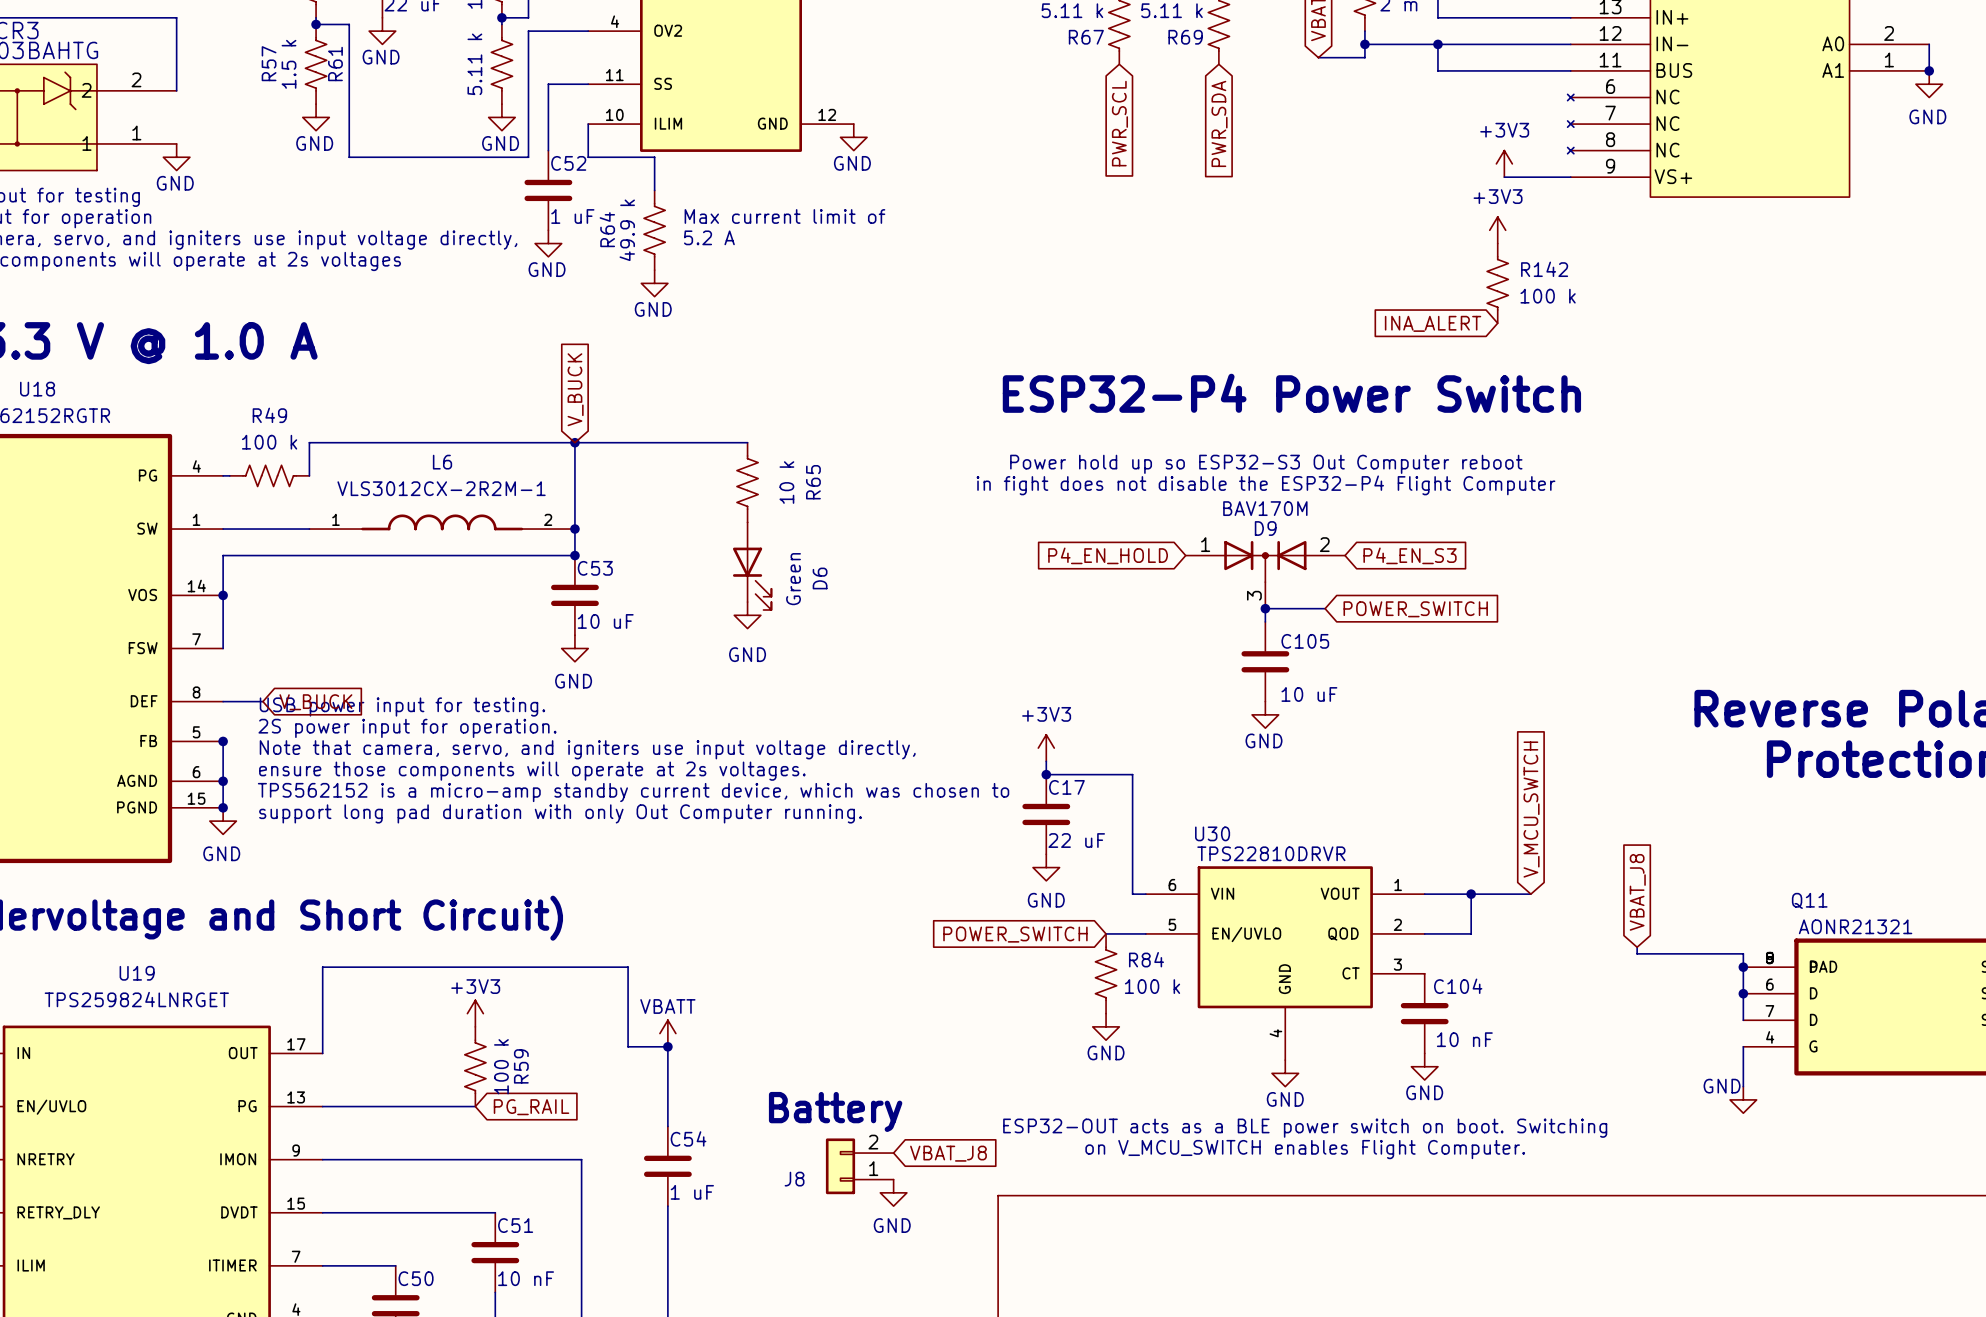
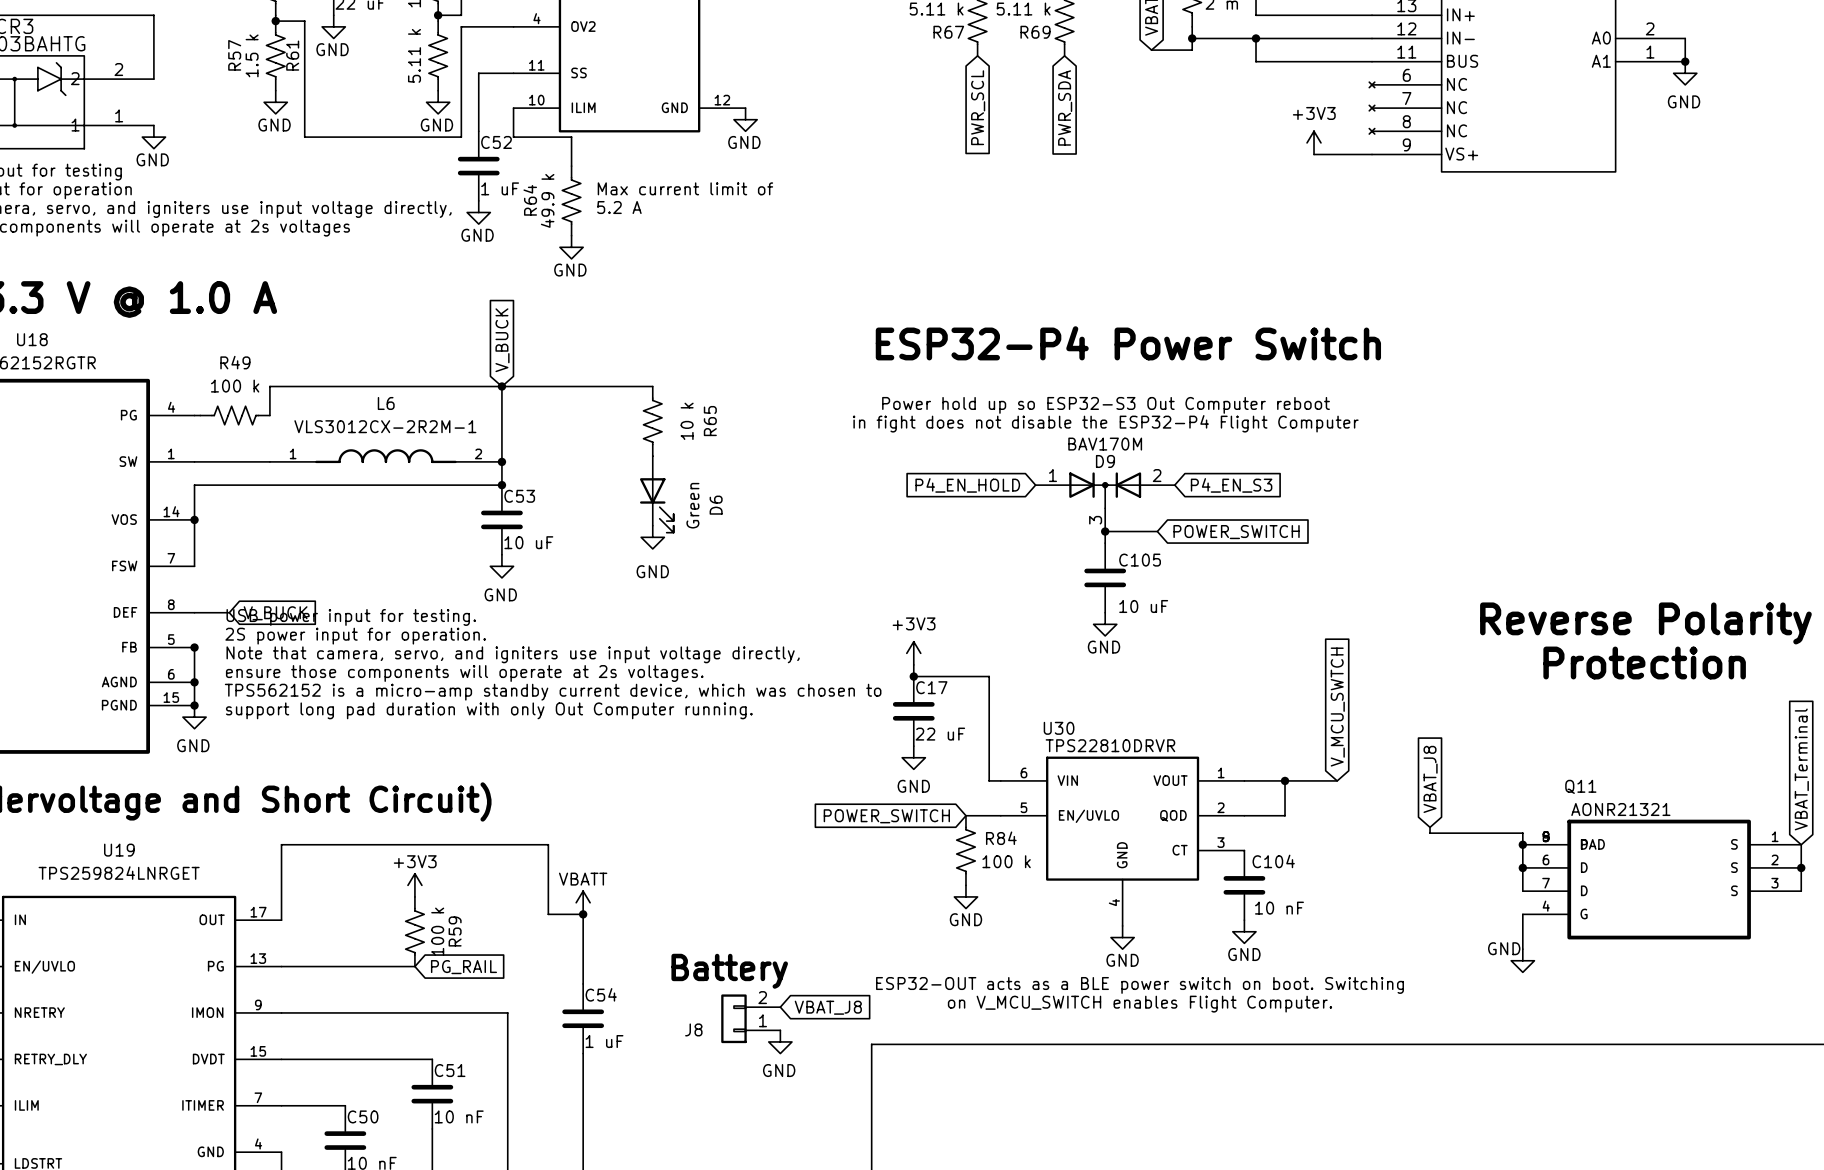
power symbol: +3V3 (1497, 230) -> none
R142: 100 k (1497, 283) -> none
global label: INA_ALERT (1433, 323) -> none

